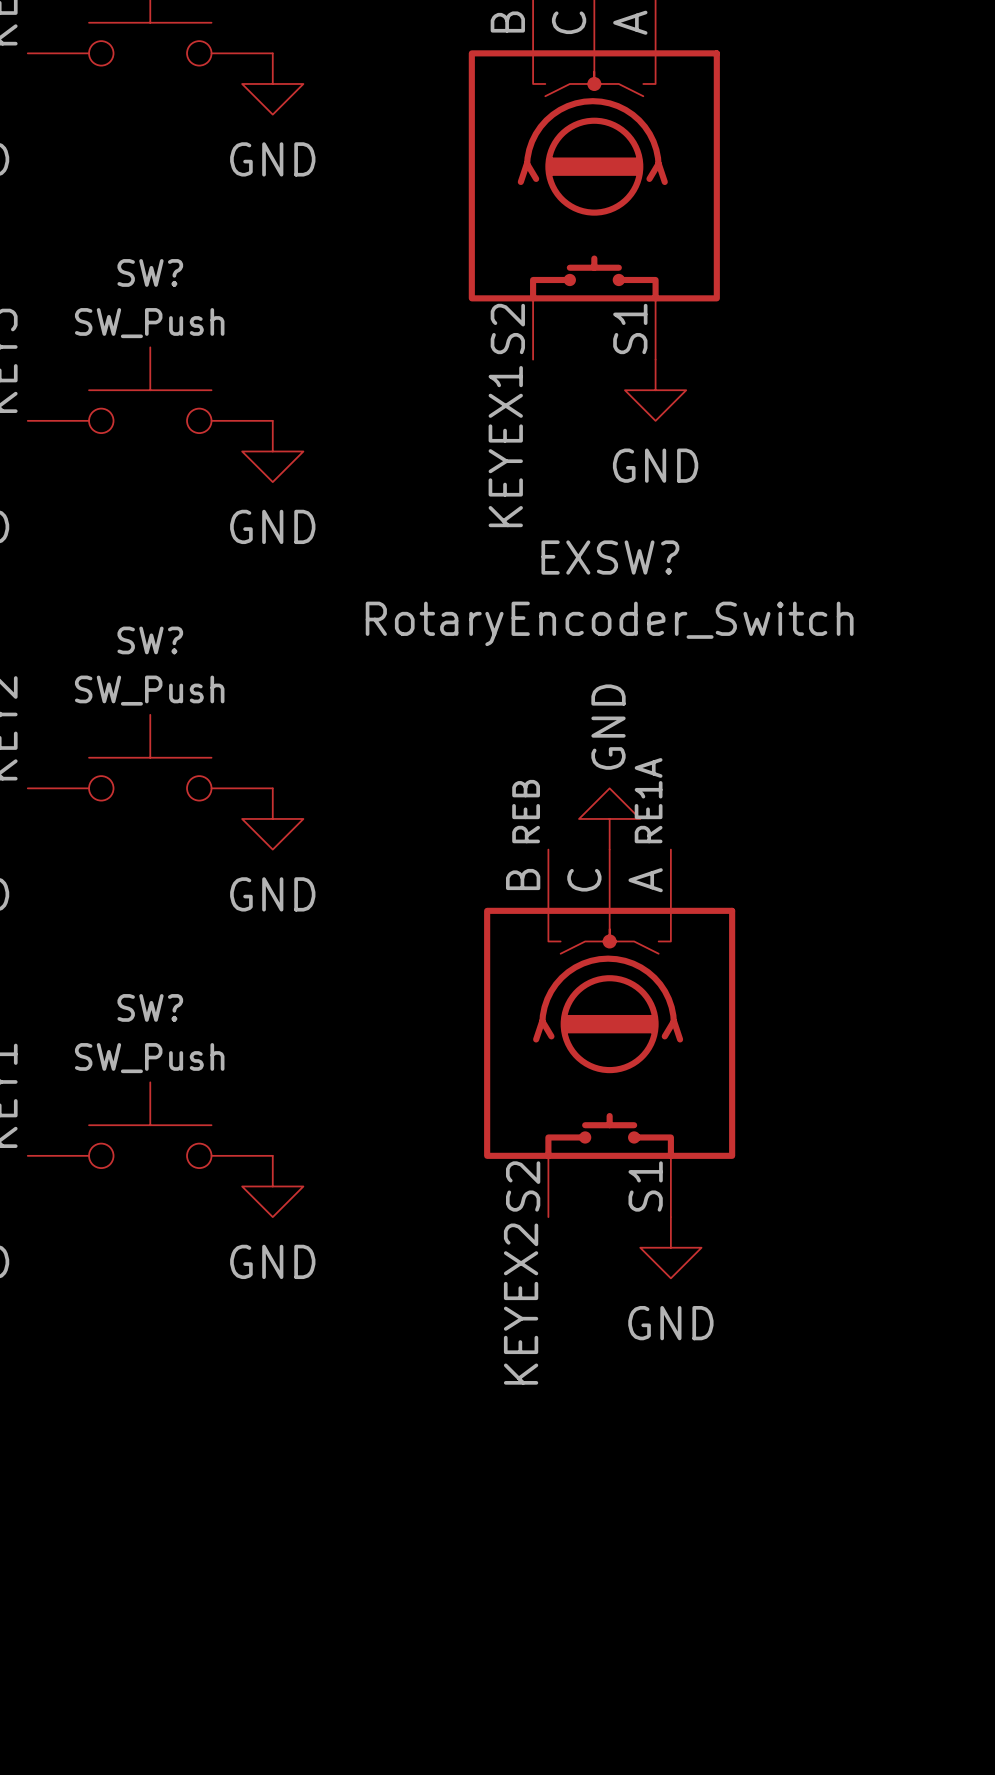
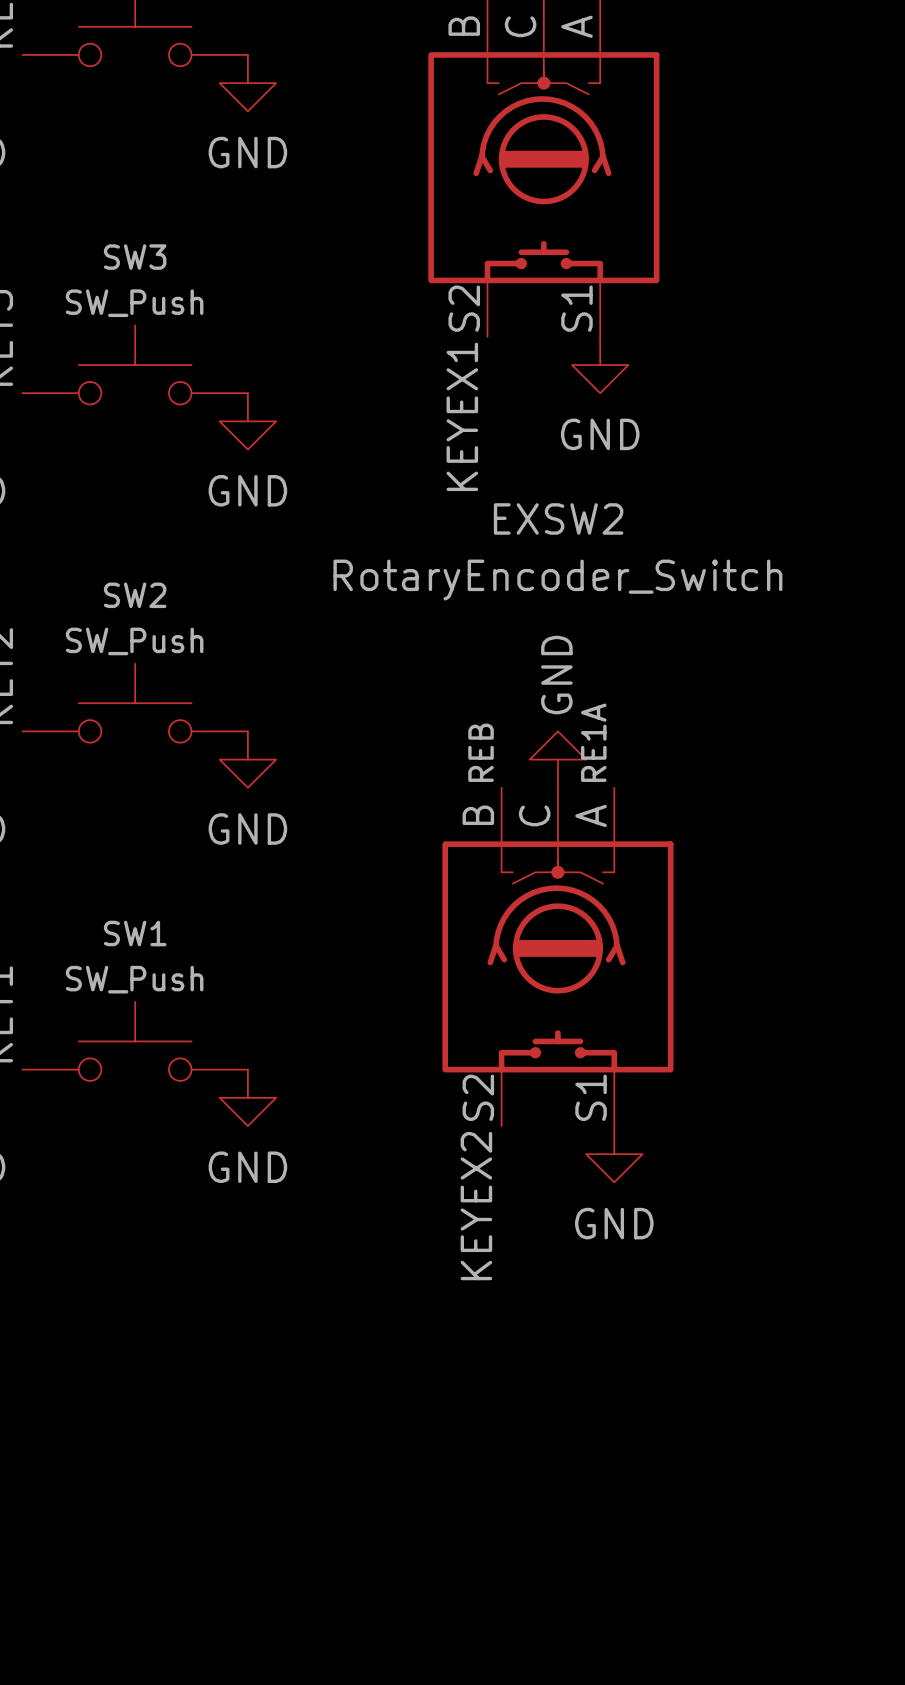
SW? name: SW? (150, 272) -> SW3 (135, 257)
EXSW? name: EXSW? (610, 557) -> EXSW2 (558, 518)
SW? name: SW? (150, 640) -> SW2 (135, 595)
SW? name: SW? (150, 1007) -> SW1 (135, 933)

